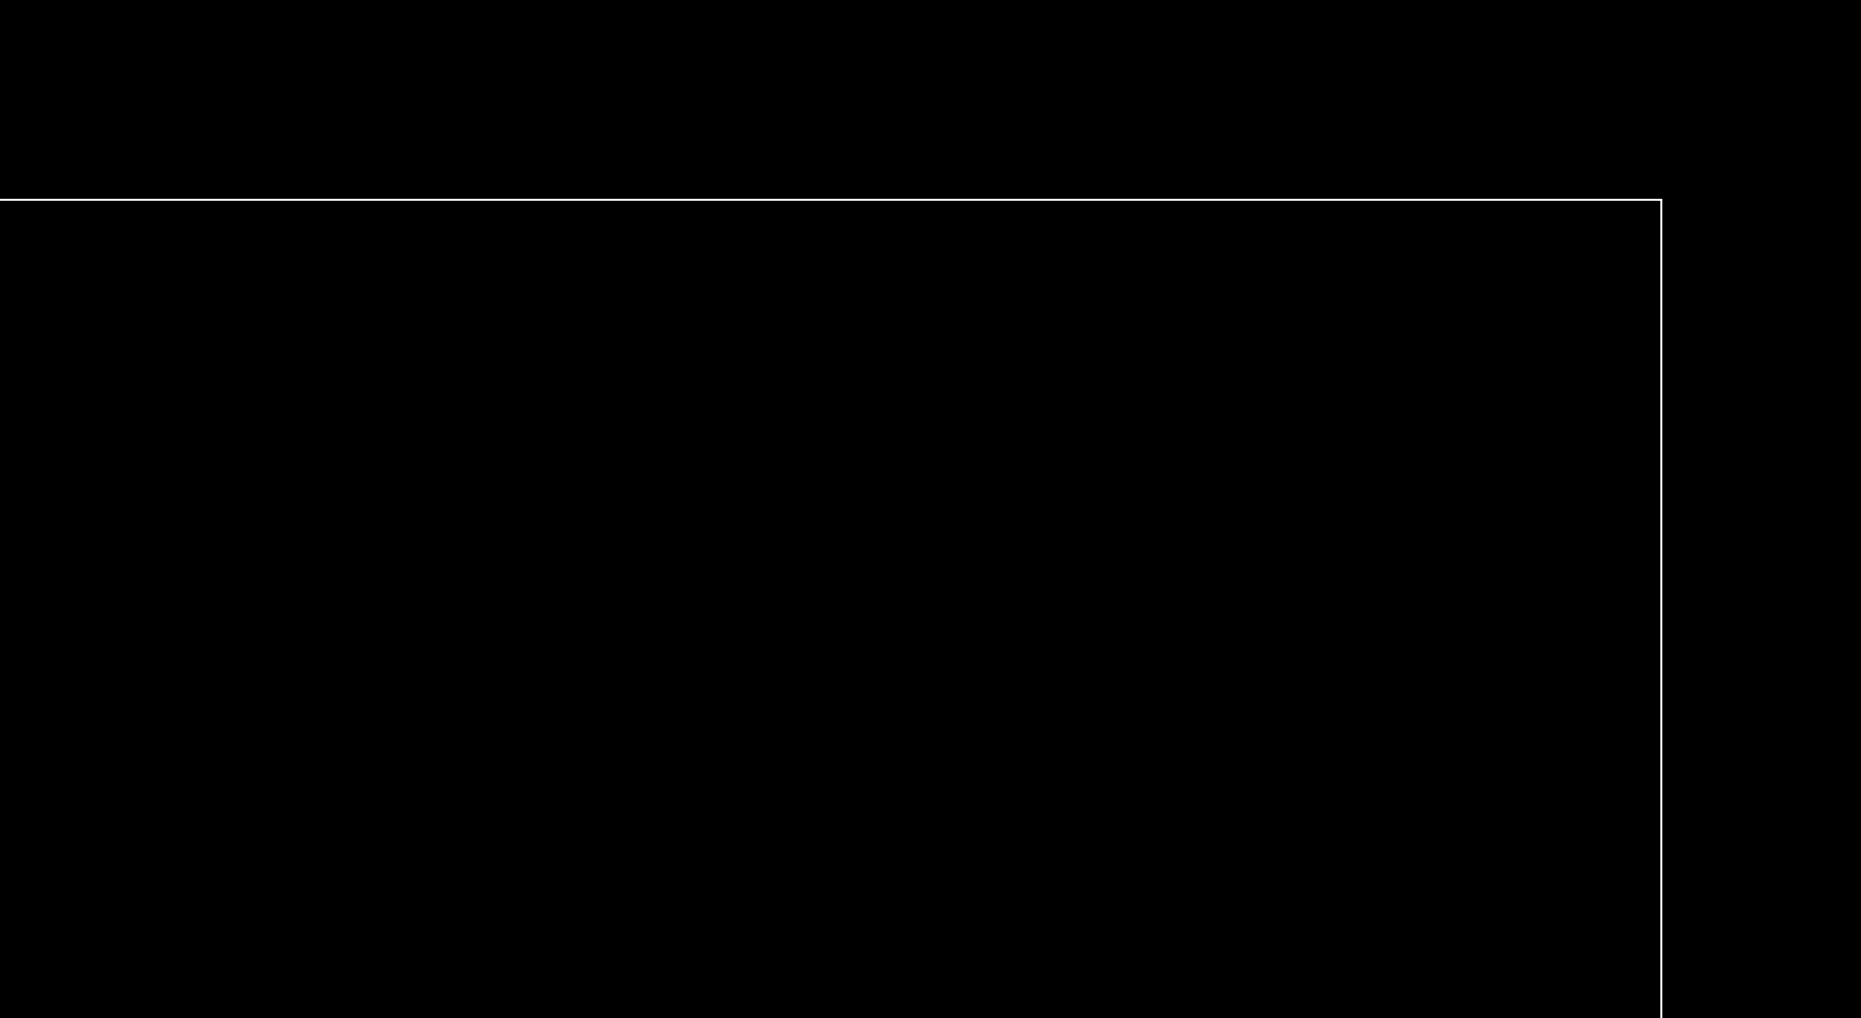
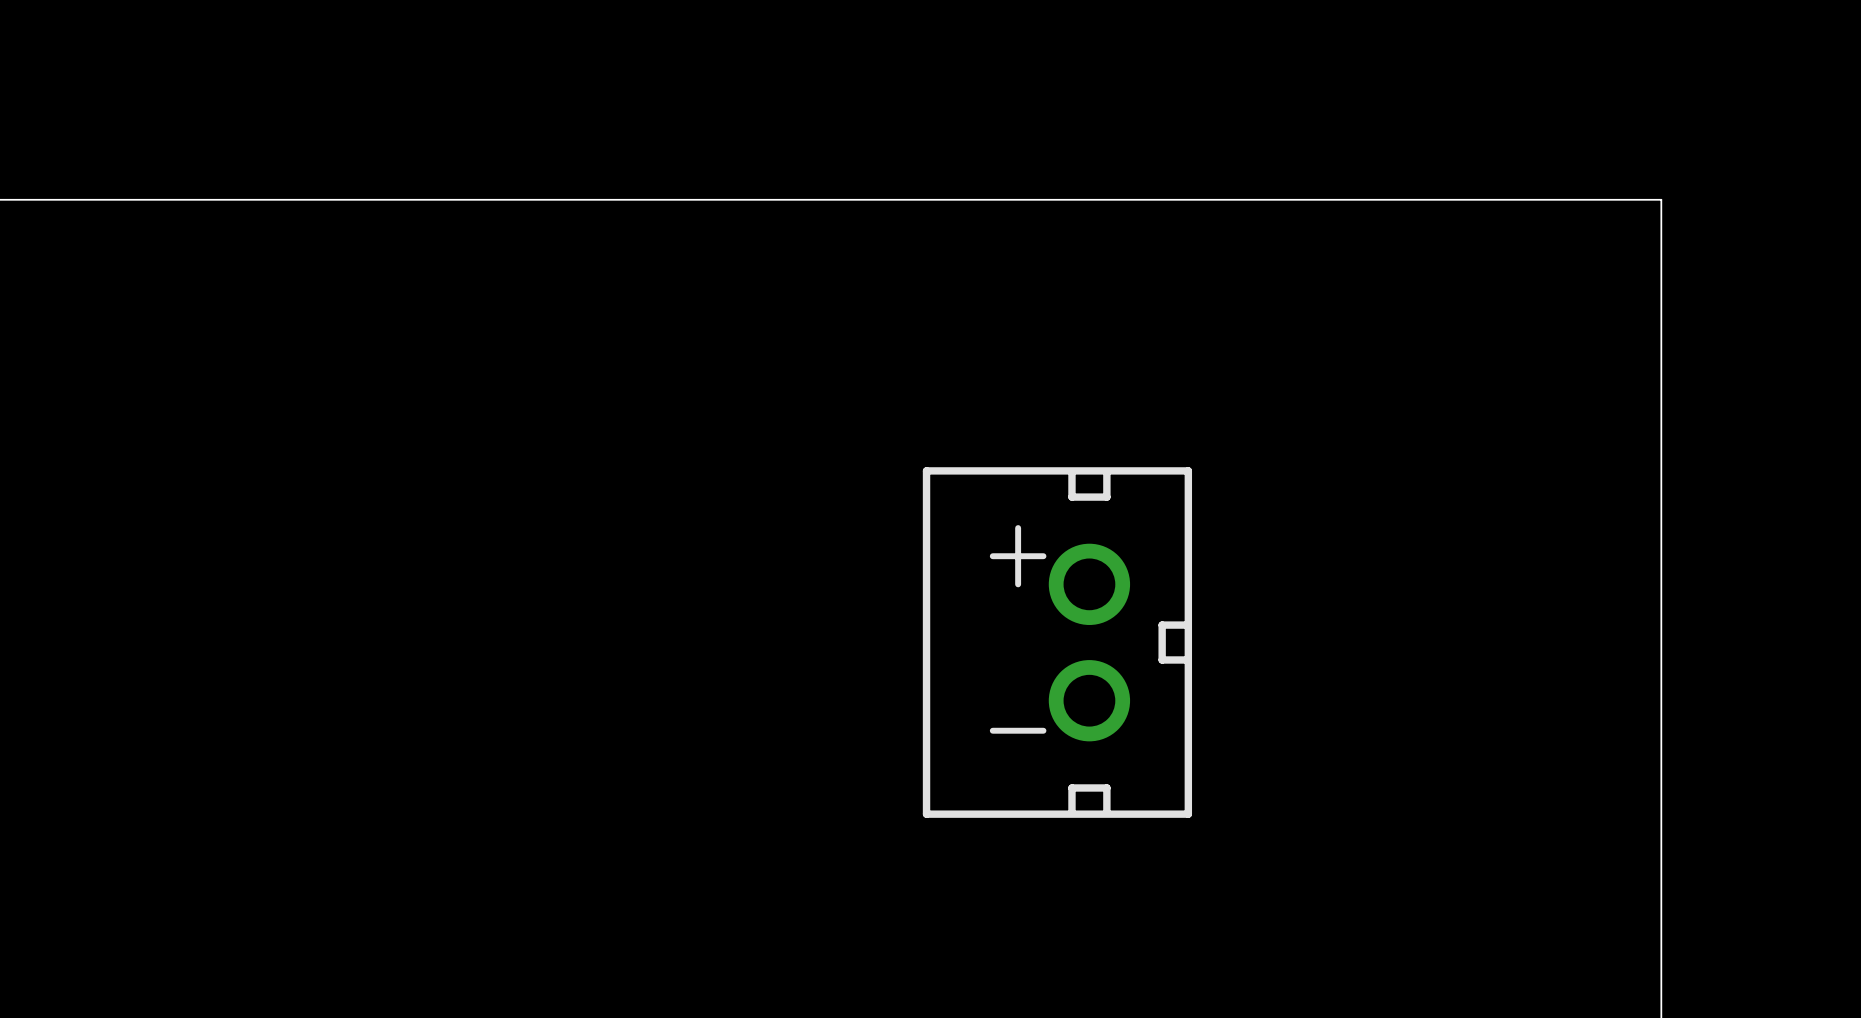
part: none -> (1057, 642)

